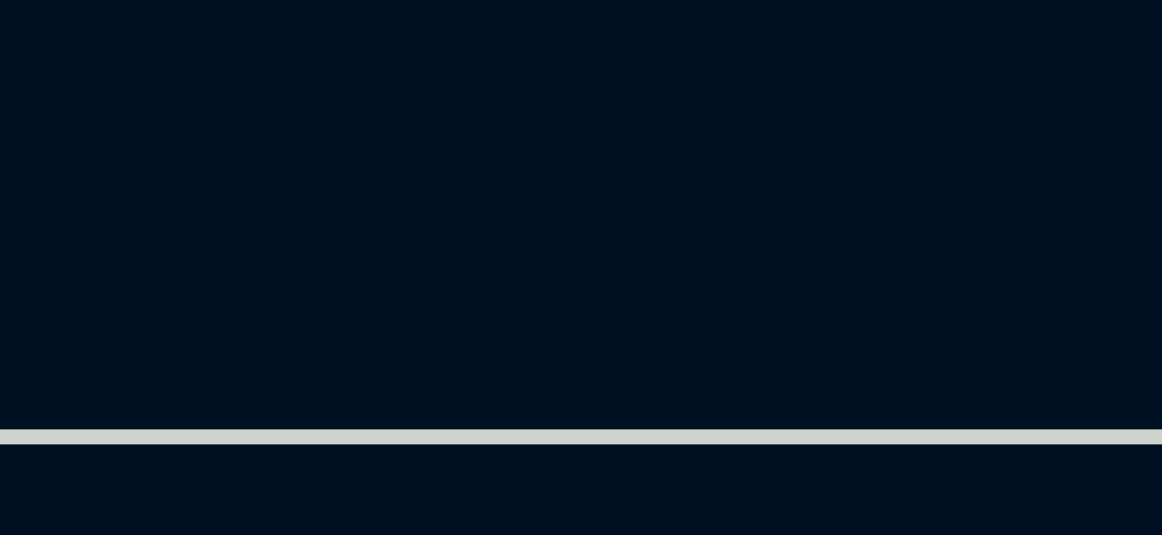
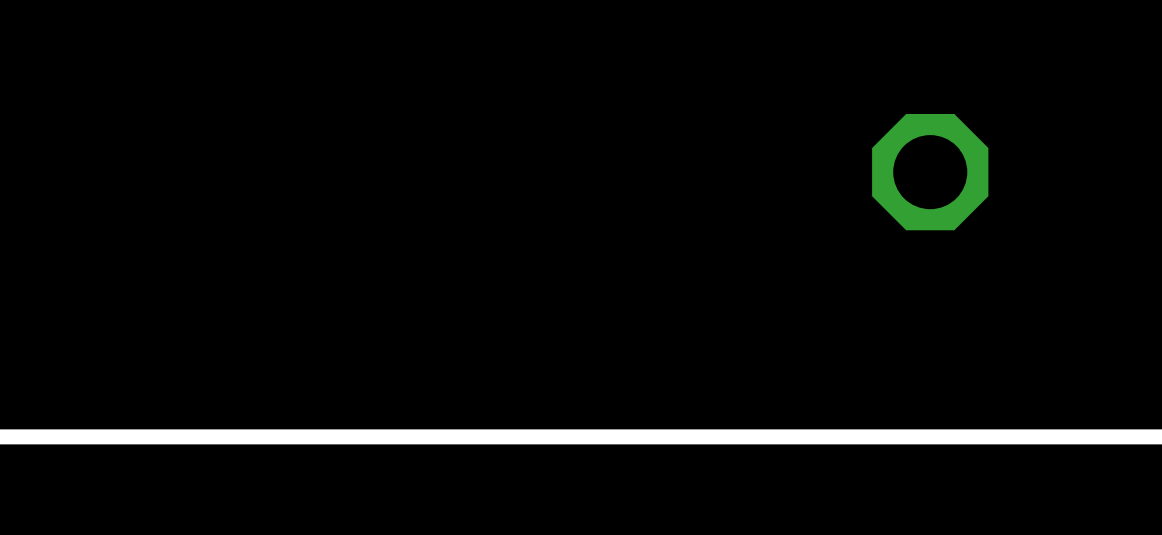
part: none -> (930, 172)

